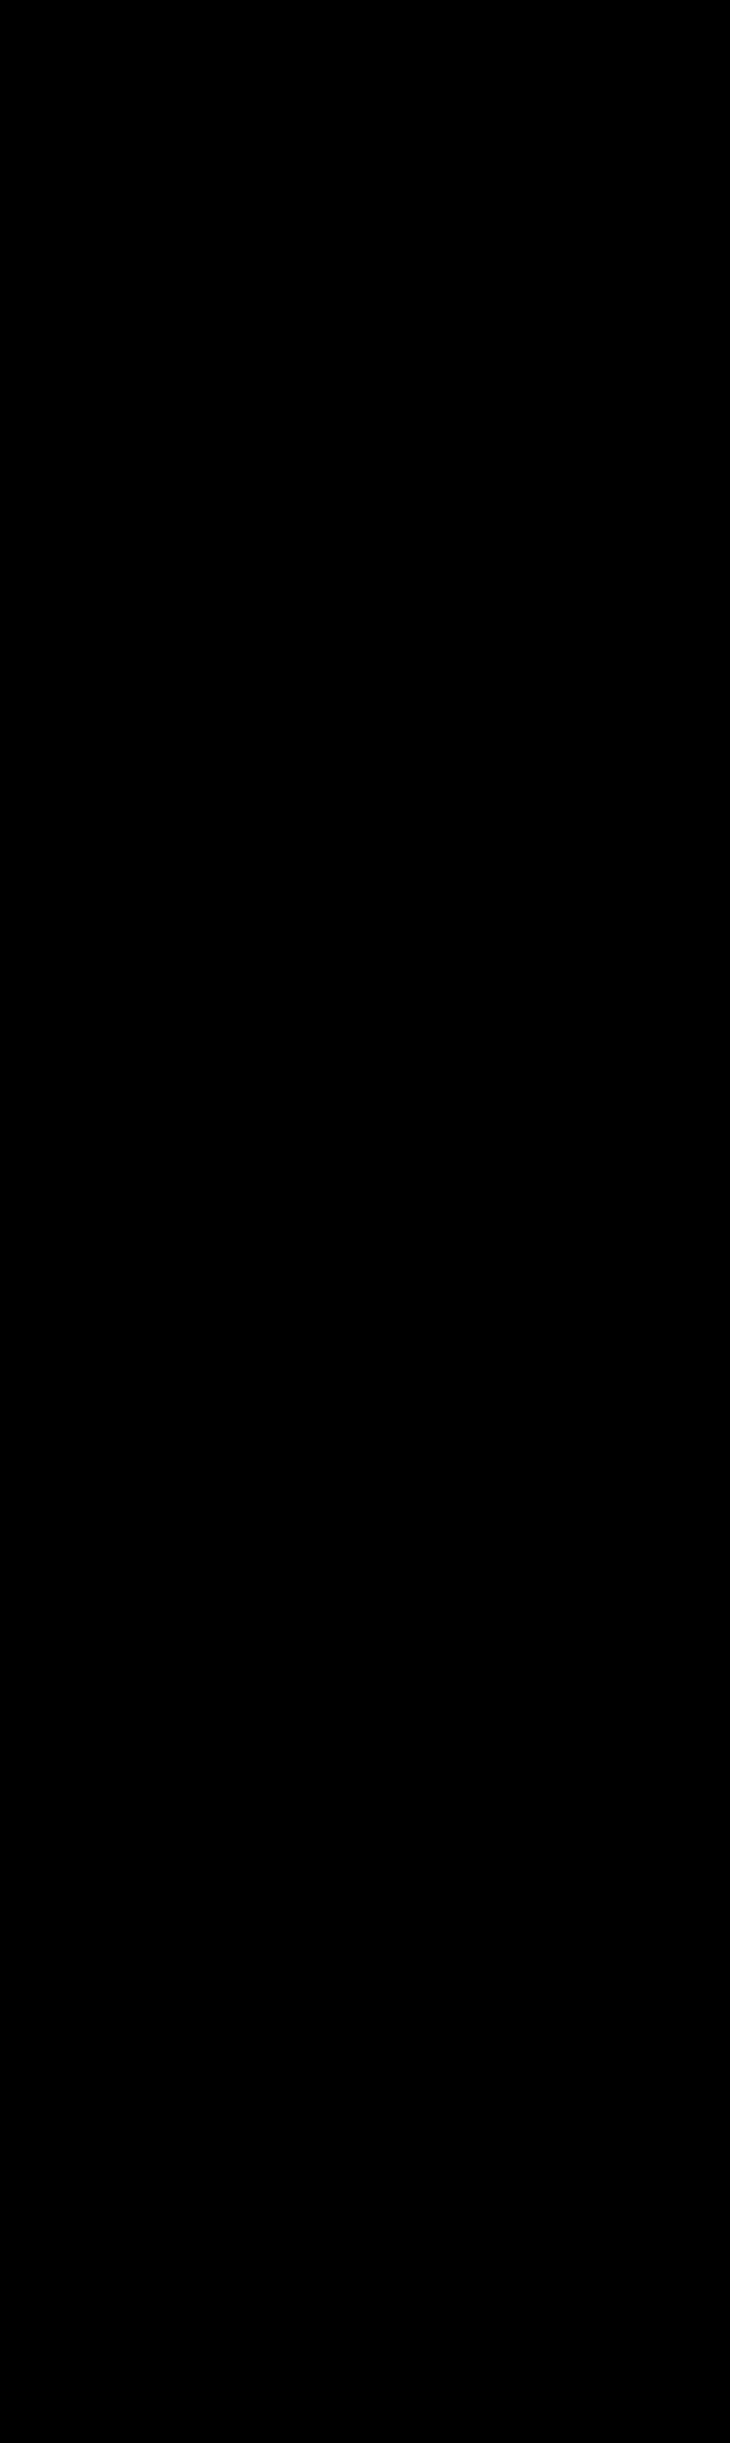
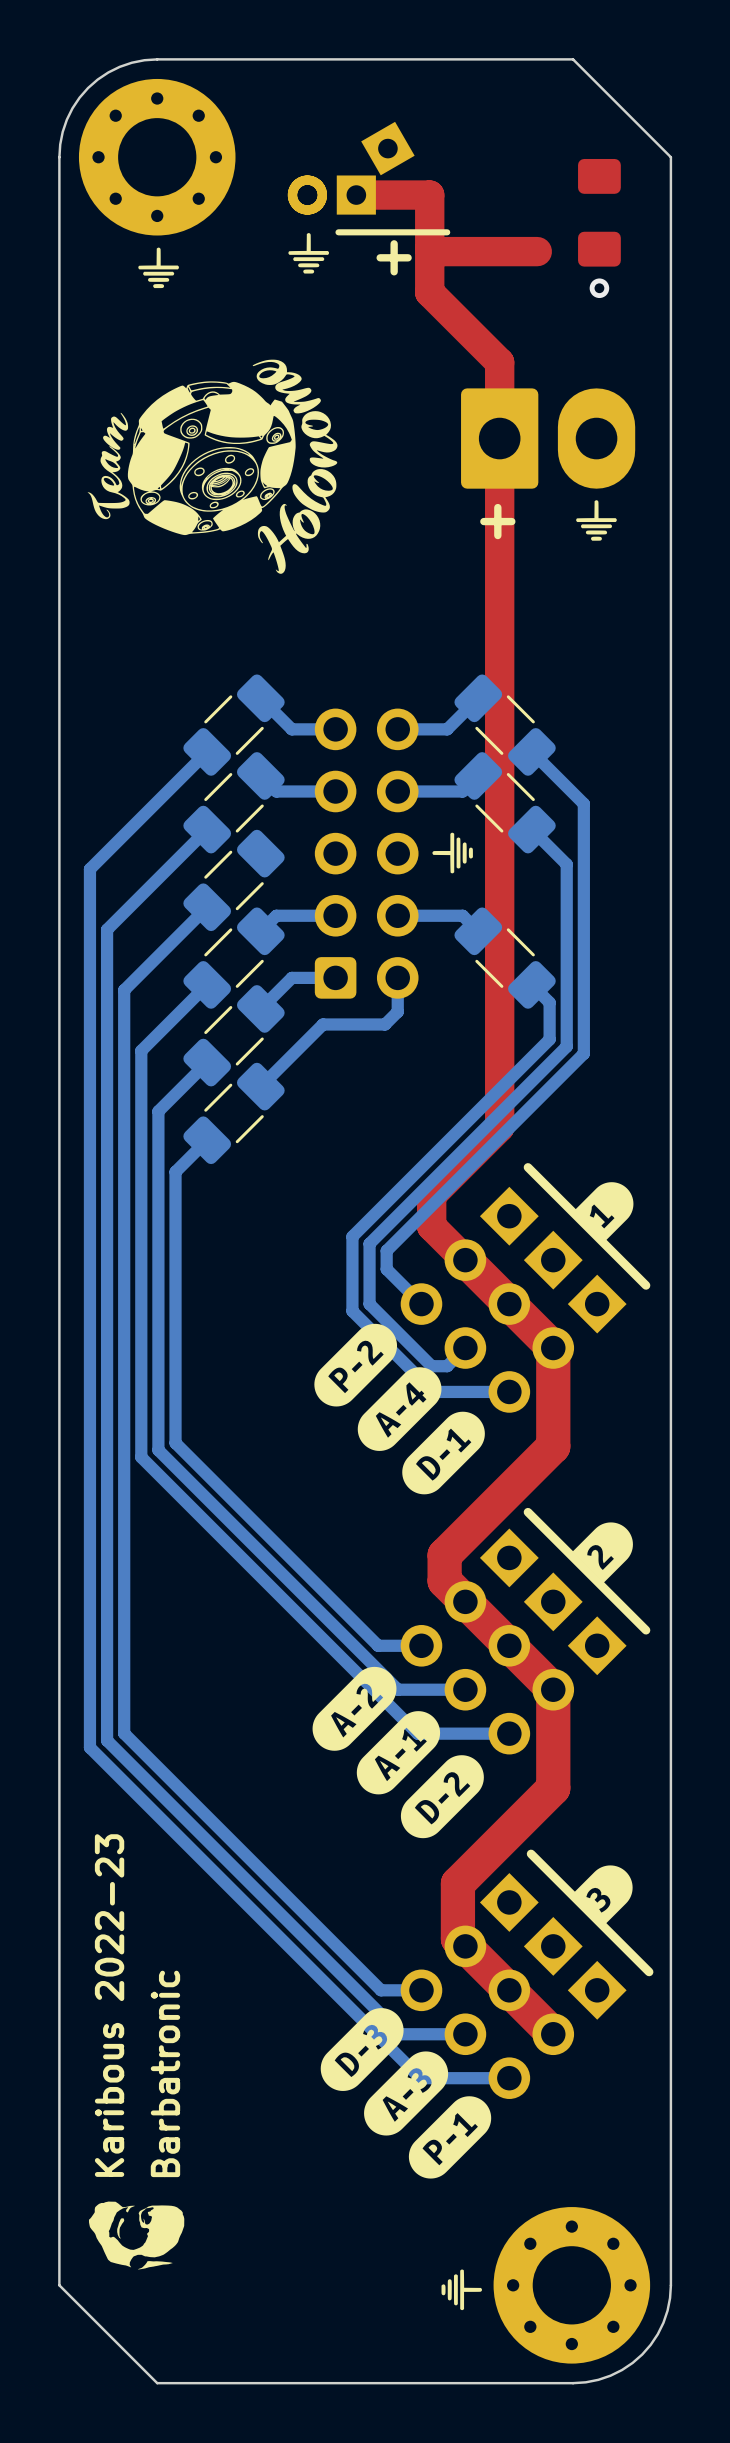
board edge: none -> (573, 59) (670, 157) (670, 2298) (663, 2322) (650, 2344) (642, 2354) (621, 2370) (598, 2379) (585, 2382) (157, 2383) (59, 2285) (60, 144) (62, 131) (72, 108) (88, 88) (97, 79) (119, 66) (144, 60) (573, 59)
part: none -> (157, 157)
part: none -> (351, 168)
part: none -> (331, 195)
top track: none -> (356, 195) (429, 195) (429, 292) (499, 362) (499, 1127) (431, 1195) (431, 1226) (553, 1348) (553, 1446) (444, 1555) (444, 1581) (553, 1689) (553, 1788) (457, 1883) (457, 1938) (553, 2034)
part: none -> (599, 212)
line: none -> (447, 232) (338, 232)
drawing: none -> [288, 233, 330, 274]
drawing: none -> [138, 247, 179, 289]
top track: none -> (429, 249) (432, 251) (537, 251)
text: none -> + (394, 257)
via: none -> (599, 288)
drawing: none -> [87, 359, 338, 574]
part: none -> (548, 438)
drawing: none -> [576, 500, 617, 541]
text: none -> + (497, 521)
bottom track: none -> (260, 698) (291, 729) (335, 729)
bottom track: none -> (478, 698) (447, 729) (397, 729)
part: none -> (234, 725)
part: none -> (505, 725)
bottom track: none -> (207, 751) (89, 869) (89, 1747) (420, 2078) (509, 2078)
bottom track: none -> (531, 751) (583, 803) (583, 1053) (386, 1250) (386, 1269) (421, 1304)
bottom track: none -> (260, 775) (276, 791) (335, 791)
bottom track: none -> (478, 775) (462, 791) (397, 791)
part: none -> (234, 802)
part: none -> (505, 802)
bottom track: none -> (207, 829) (107, 929) (107, 1740) (400, 2034) (465, 2034)
bottom track: none -> (531, 829) (566, 864) (566, 1046) (369, 1243) (369, 1304) (431, 1366) (447, 1366) (465, 1348)
drawing: none -> [432, 832, 473, 874]
part: none -> (366, 853)
part: none -> (234, 880)
bottom track: none -> (207, 907) (124, 990) (124, 1733) (381, 1990) (421, 1990)
bottom track: none -> (335, 915) (276, 915) (260, 931)
bottom track: none -> (397, 915) (462, 915) (478, 931)
part: none -> (234, 958)
part: none -> (505, 958)
bottom track: none -> (335, 977) (291, 977) (260, 1008)
bottom track: none -> (400, 980) (397, 977) (397, 1011) (385, 1024) (322, 1024) (260, 1086)
bottom track: none -> (207, 984) (141, 1050) (141, 1457) (417, 1733) (509, 1733)
bottom track: none -> (531, 984) (549, 1002) (549, 1039) (352, 1236) (352, 1311) (433, 1391) (509, 1391)
part: none -> (234, 1035)
bottom track: none -> (207, 1062) (158, 1111) (158, 1450) (397, 1689) (465, 1689)
part: none -> (234, 1113)
bottom track: none -> (207, 1140) (175, 1171) (175, 1443) (378, 1645) (421, 1645)
line: none -> (527, 1167) (646, 1285)
drawing: none -> [573, 1182, 634, 1242]
part: none -> (469, 1255)
part: none -> (513, 1299)
drawing: none -> [314, 1323, 485, 1495]
part: none -> (557, 1343)
line: none -> (527, 1512) (646, 1630)
drawing: none -> [572, 1522, 633, 1583]
part: none -> (469, 1597)
part: none -> (513, 1641)
drawing: none -> [312, 1666, 484, 1839]
part: none -> (557, 1685)
line: none -> (531, 1853) (649, 1971)
drawing: none -> [571, 1865, 633, 1927]
part: none -> (469, 1942)
part: none -> (513, 1986)
text: none -> Karibous 2022-23 (109, 2005)
drawing: none -> [320, 2008, 492, 2179]
part: none -> (557, 2029)
text: none -> Barbatronic (165, 2073)
drawing: none -> [88, 2201, 185, 2270]
drawing: none -> [441, 2269, 483, 2311]
part: none -> (571, 2285)

